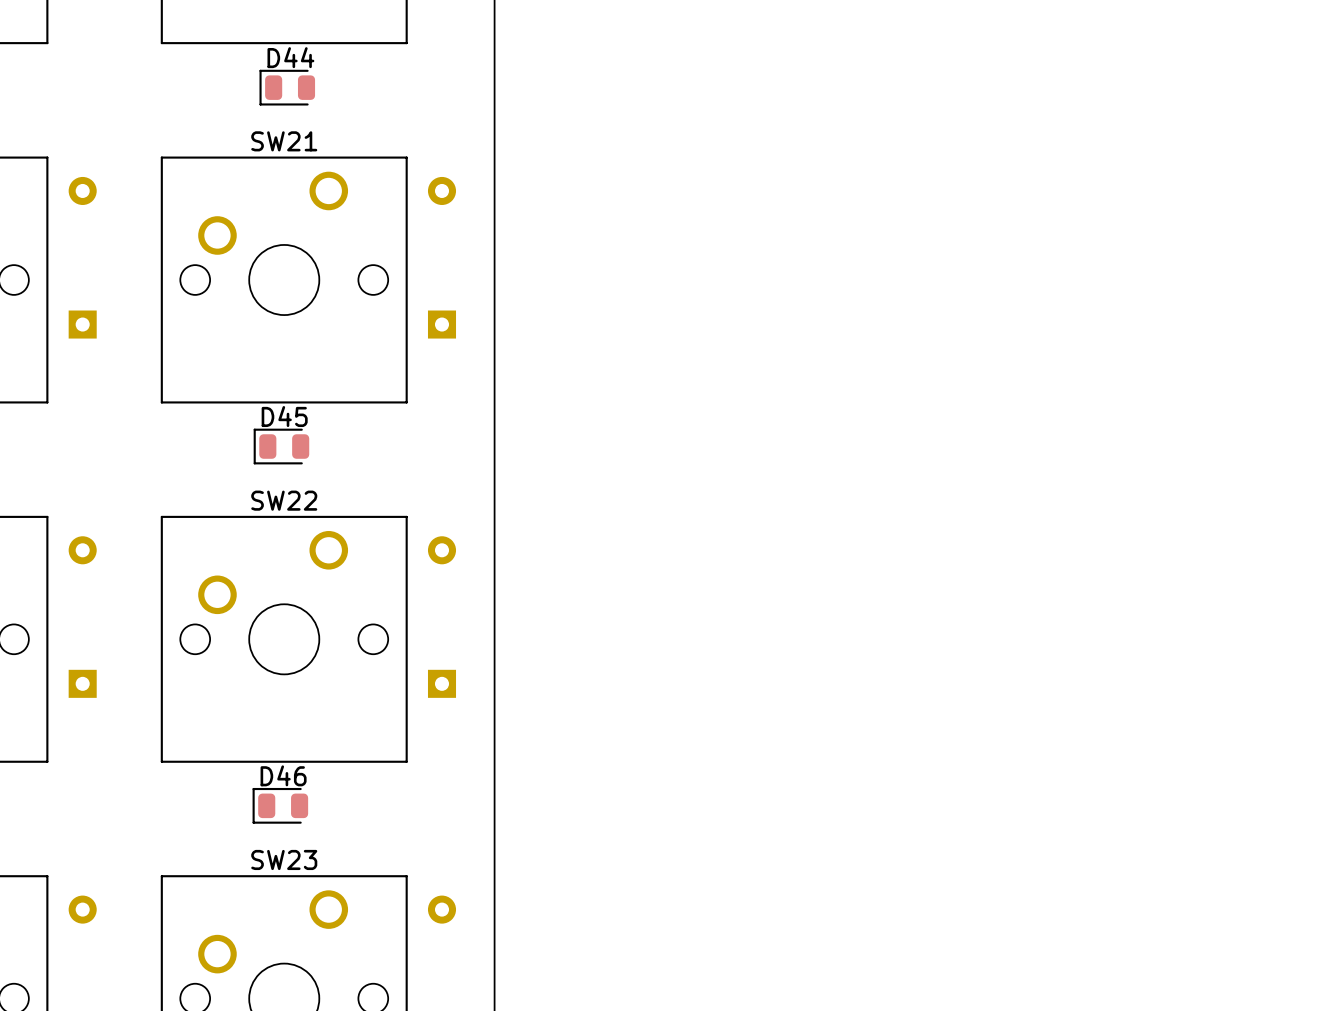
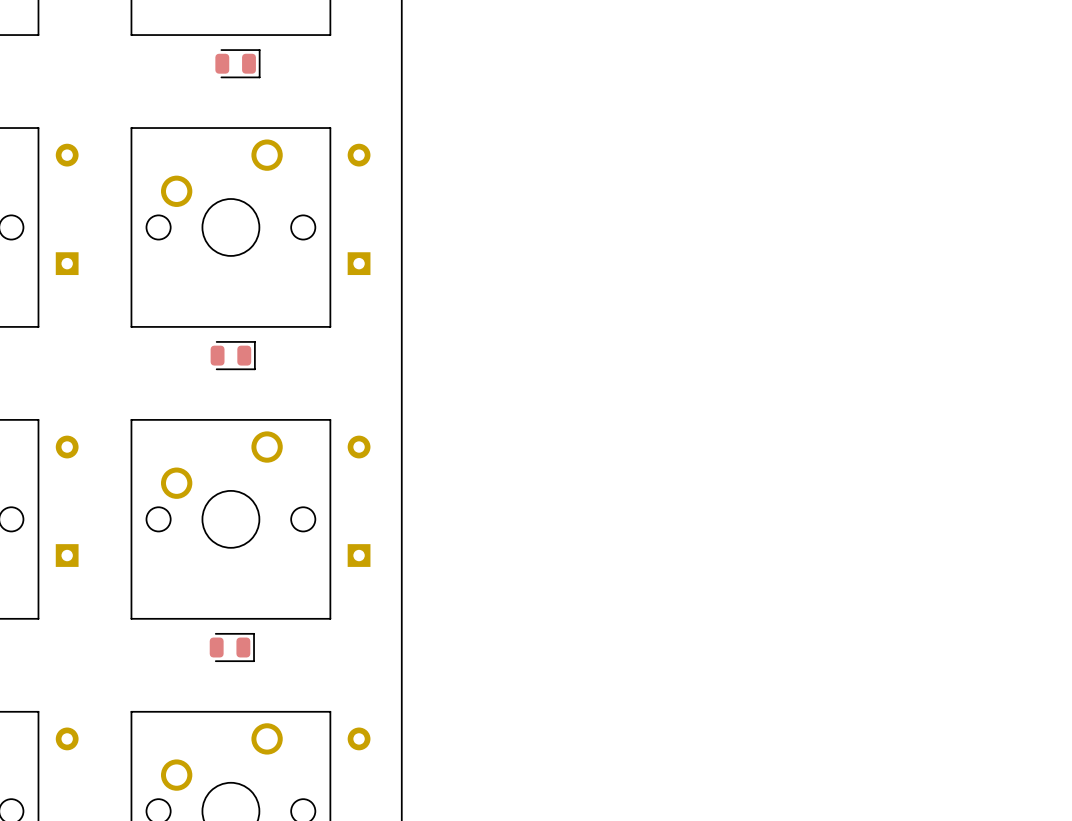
part: none -> (237, 63)
D44: (287, 87) -> none
SW21 name: SW21 (284, 141) -> none
part: none -> (233, 355)
D45: (281, 446) -> none
SW22 name: SW22 (284, 500) -> none
part: none -> (232, 647)
D46: (280, 805) -> none
SW23 name: SW23 (284, 859) -> none

